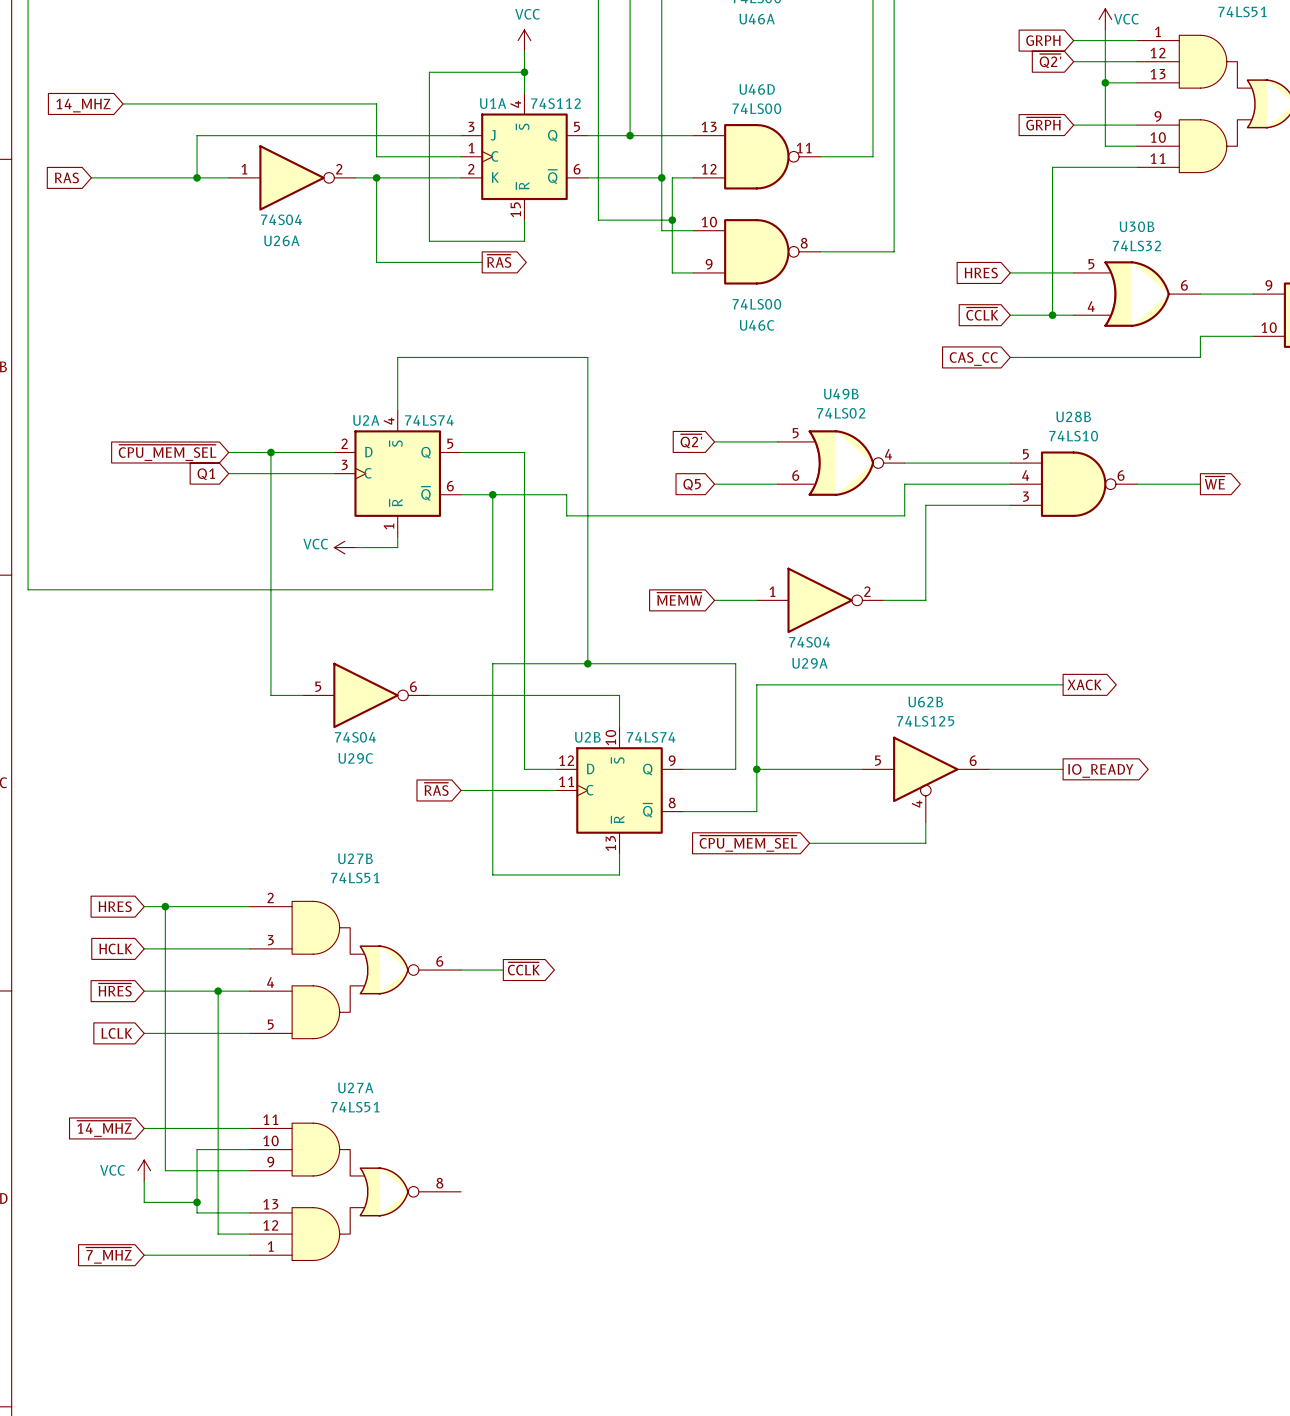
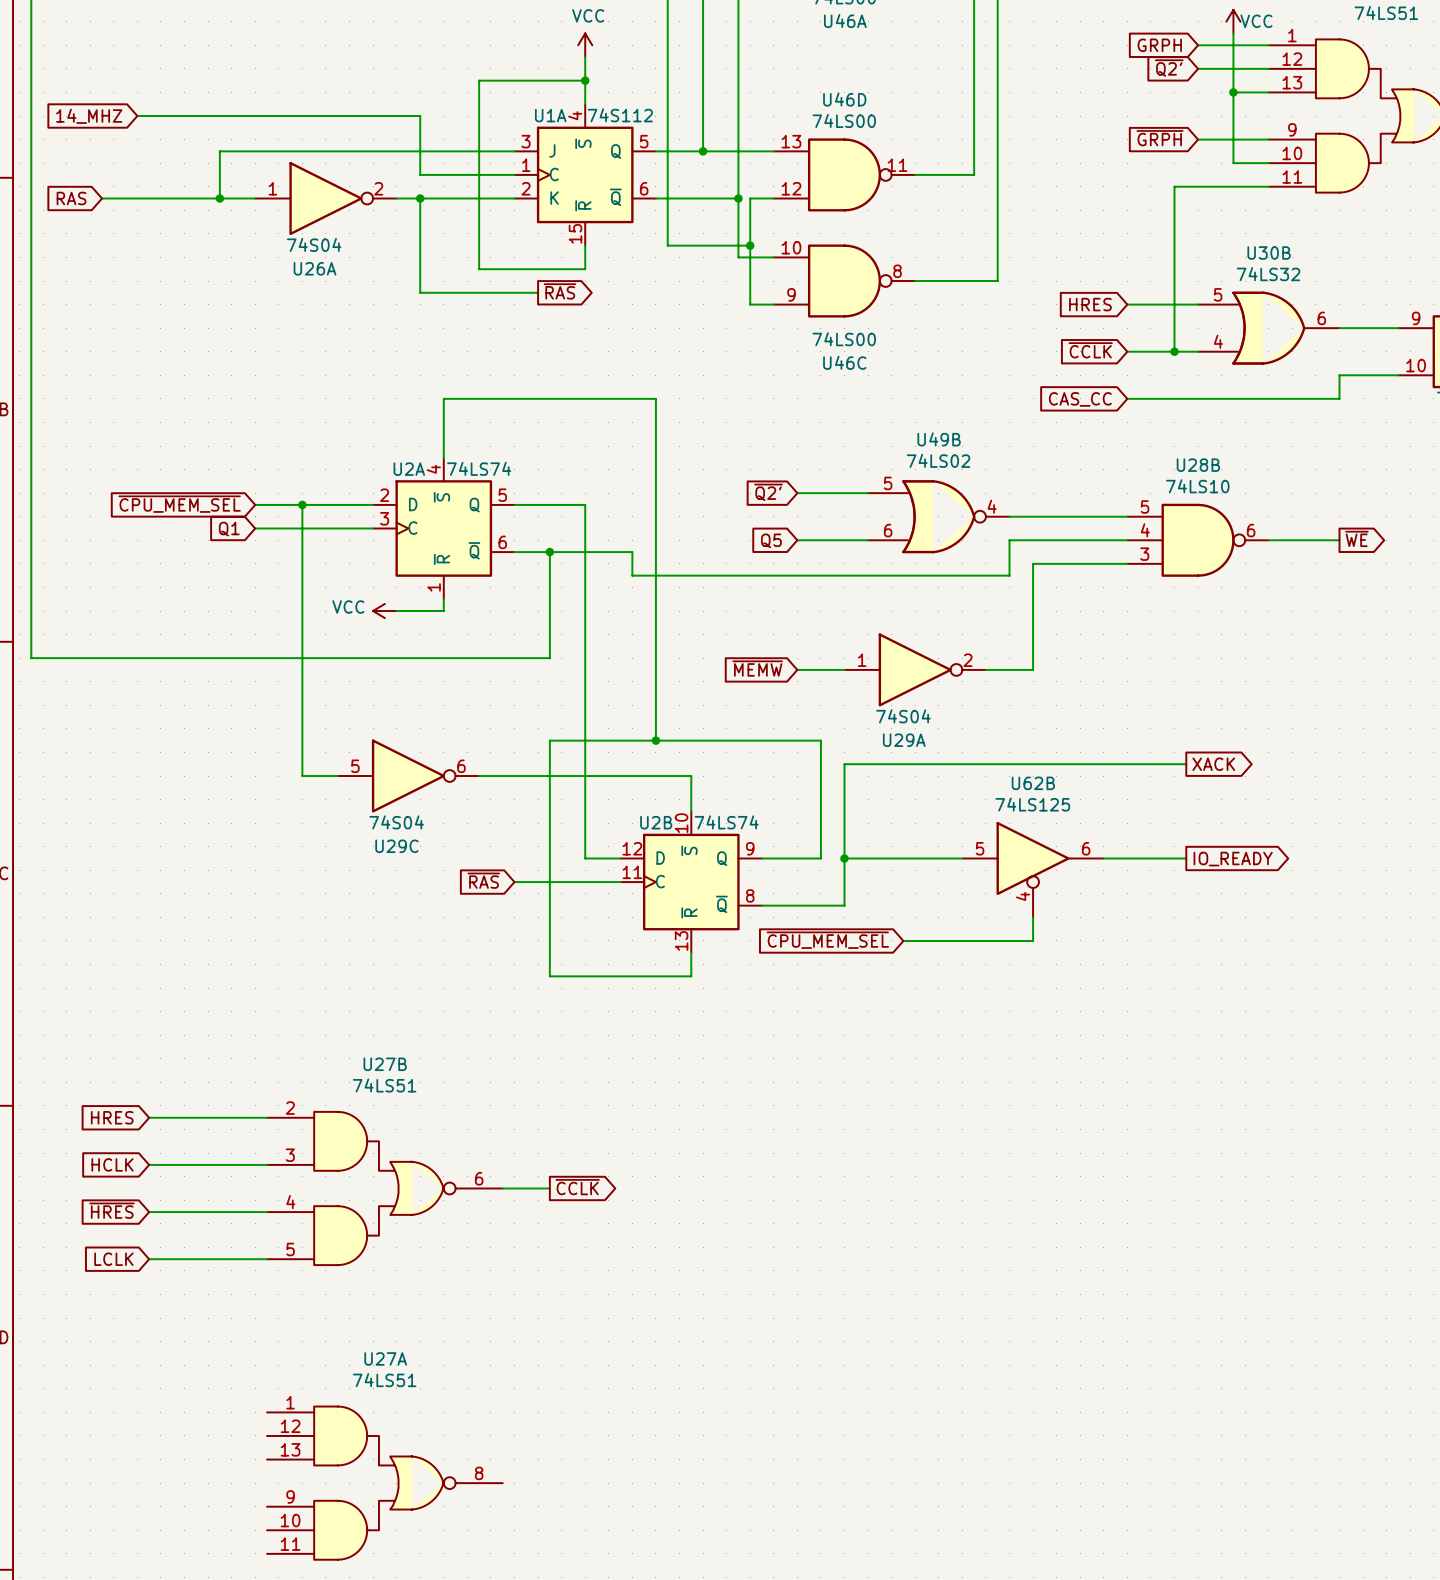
global label position: HRES (115, 906) -> HRES (112, 1117)
wire: (144, 906) (249, 906) -> (149, 1117) (267, 1117)
wire: (165, 906) (165, 1170) (249, 1170) -> none
junction: (165, 906) -> none
global label position: HCLK (115, 948) -> HCLK (112, 1164)
wire: (144, 948) (249, 948) -> (149, 1164) (267, 1164)
global label position: ~{CCLK} (523, 968) -> ~{CCLK} (577, 1187)
U27B position: (355, 970) -> (384, 1188)
wire: (461, 970) (503, 970) -> (502, 1188) (549, 1188)
global label position: ~{HRES} (115, 989) -> ~{HRES} (111, 1210)
wire: (144, 991) (249, 991) -> (149, 1212) (267, 1212)
wire: (218, 991) (218, 1234) (249, 1234) -> none
junction: (218, 991) -> none
global label position: LCLK (116, 1033) -> LCLK (113, 1259)
wire: (144, 1033) (249, 1033) -> none
global label: ~{14_MHZ} (104, 1128) -> none
wire: (249, 1149) (197, 1149) (197, 1212) (249, 1212) -> none
power symbol: VCC (144, 1170) -> none
wire: (144, 1181) (144, 1202) (197, 1202) -> none
U27A flip: as is (355, 1191) -> up-down (384, 1483)
U27A position: (355, 1191) -> (384, 1483)
junction: (197, 1202) -> none
global label: ~{7_MHZ} (108, 1255) -> none
wire: (144, 1255) (249, 1255) -> none

